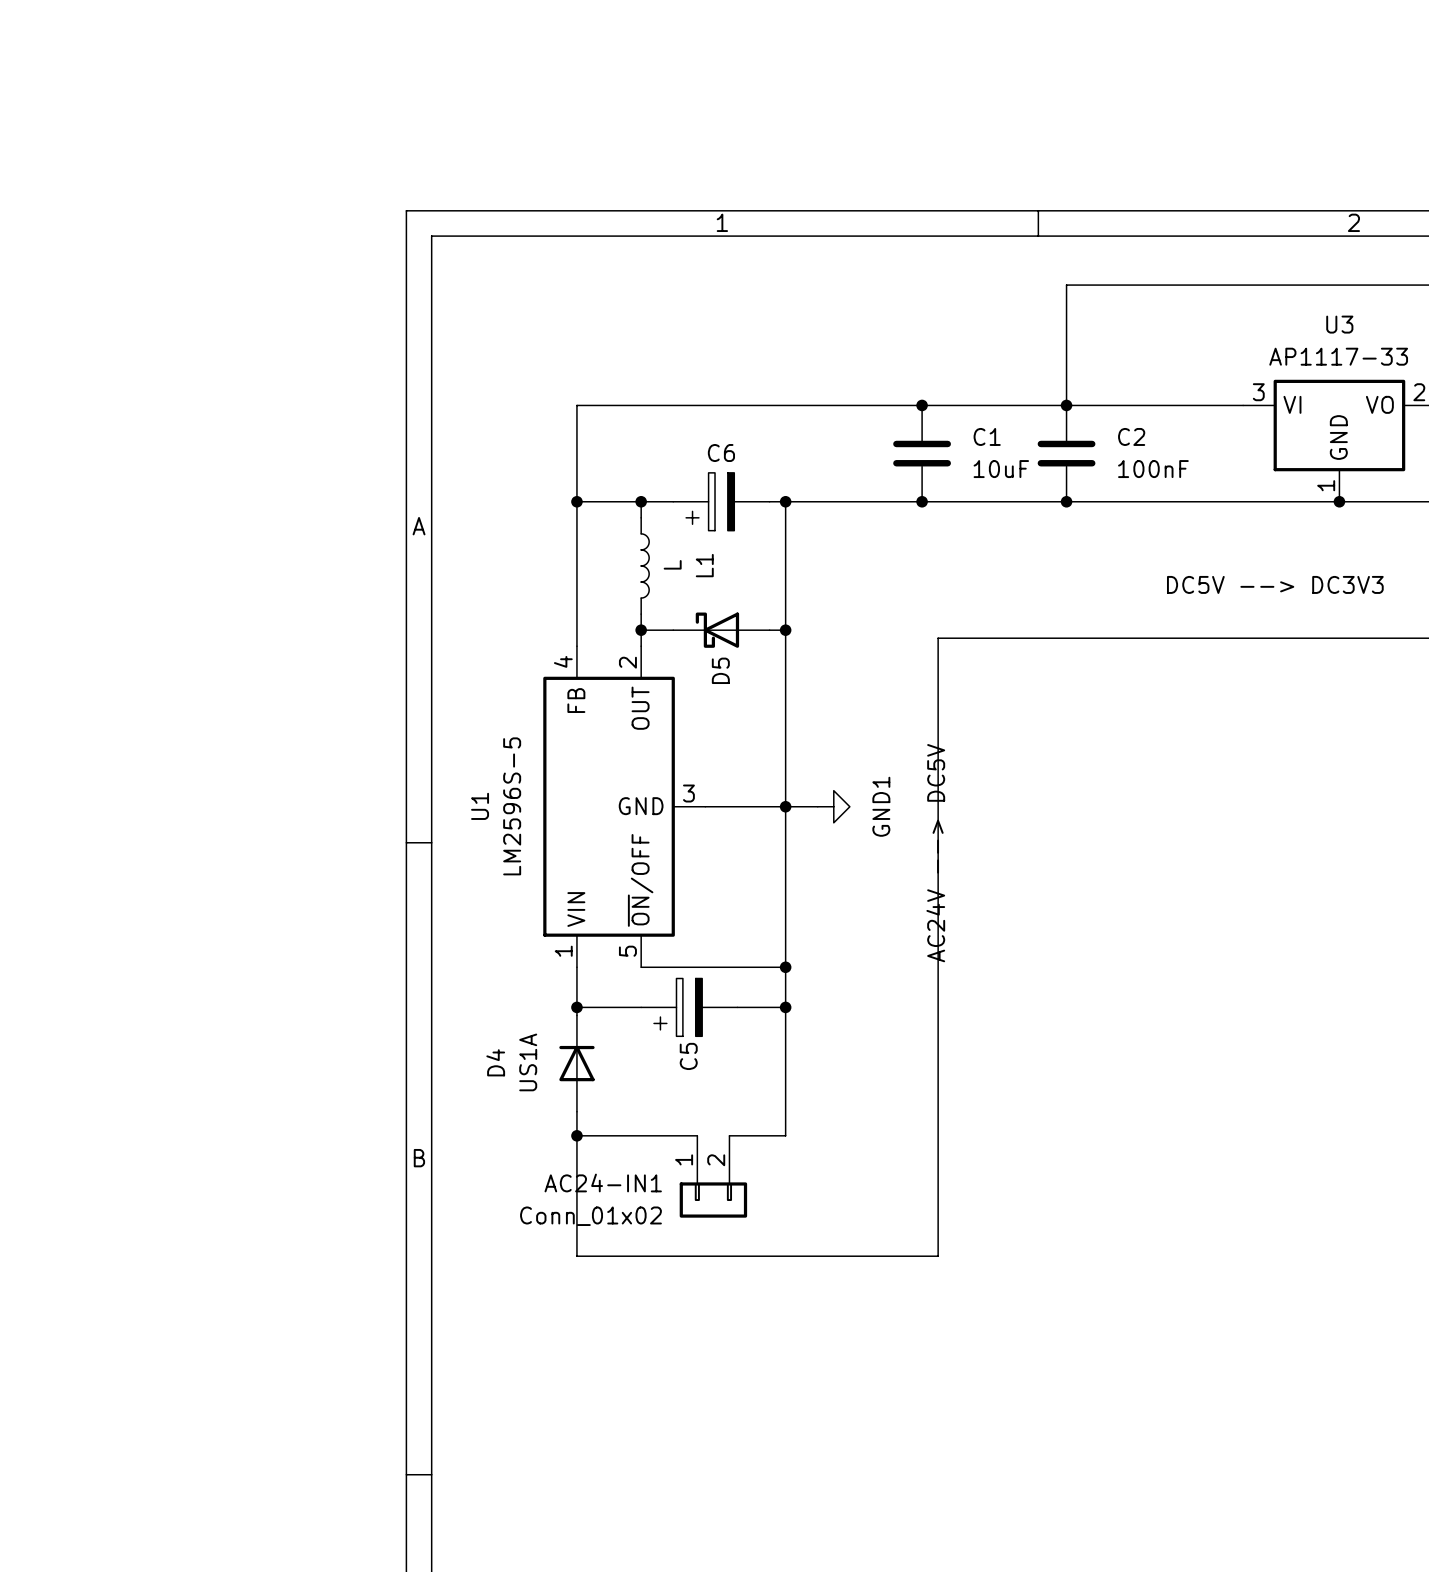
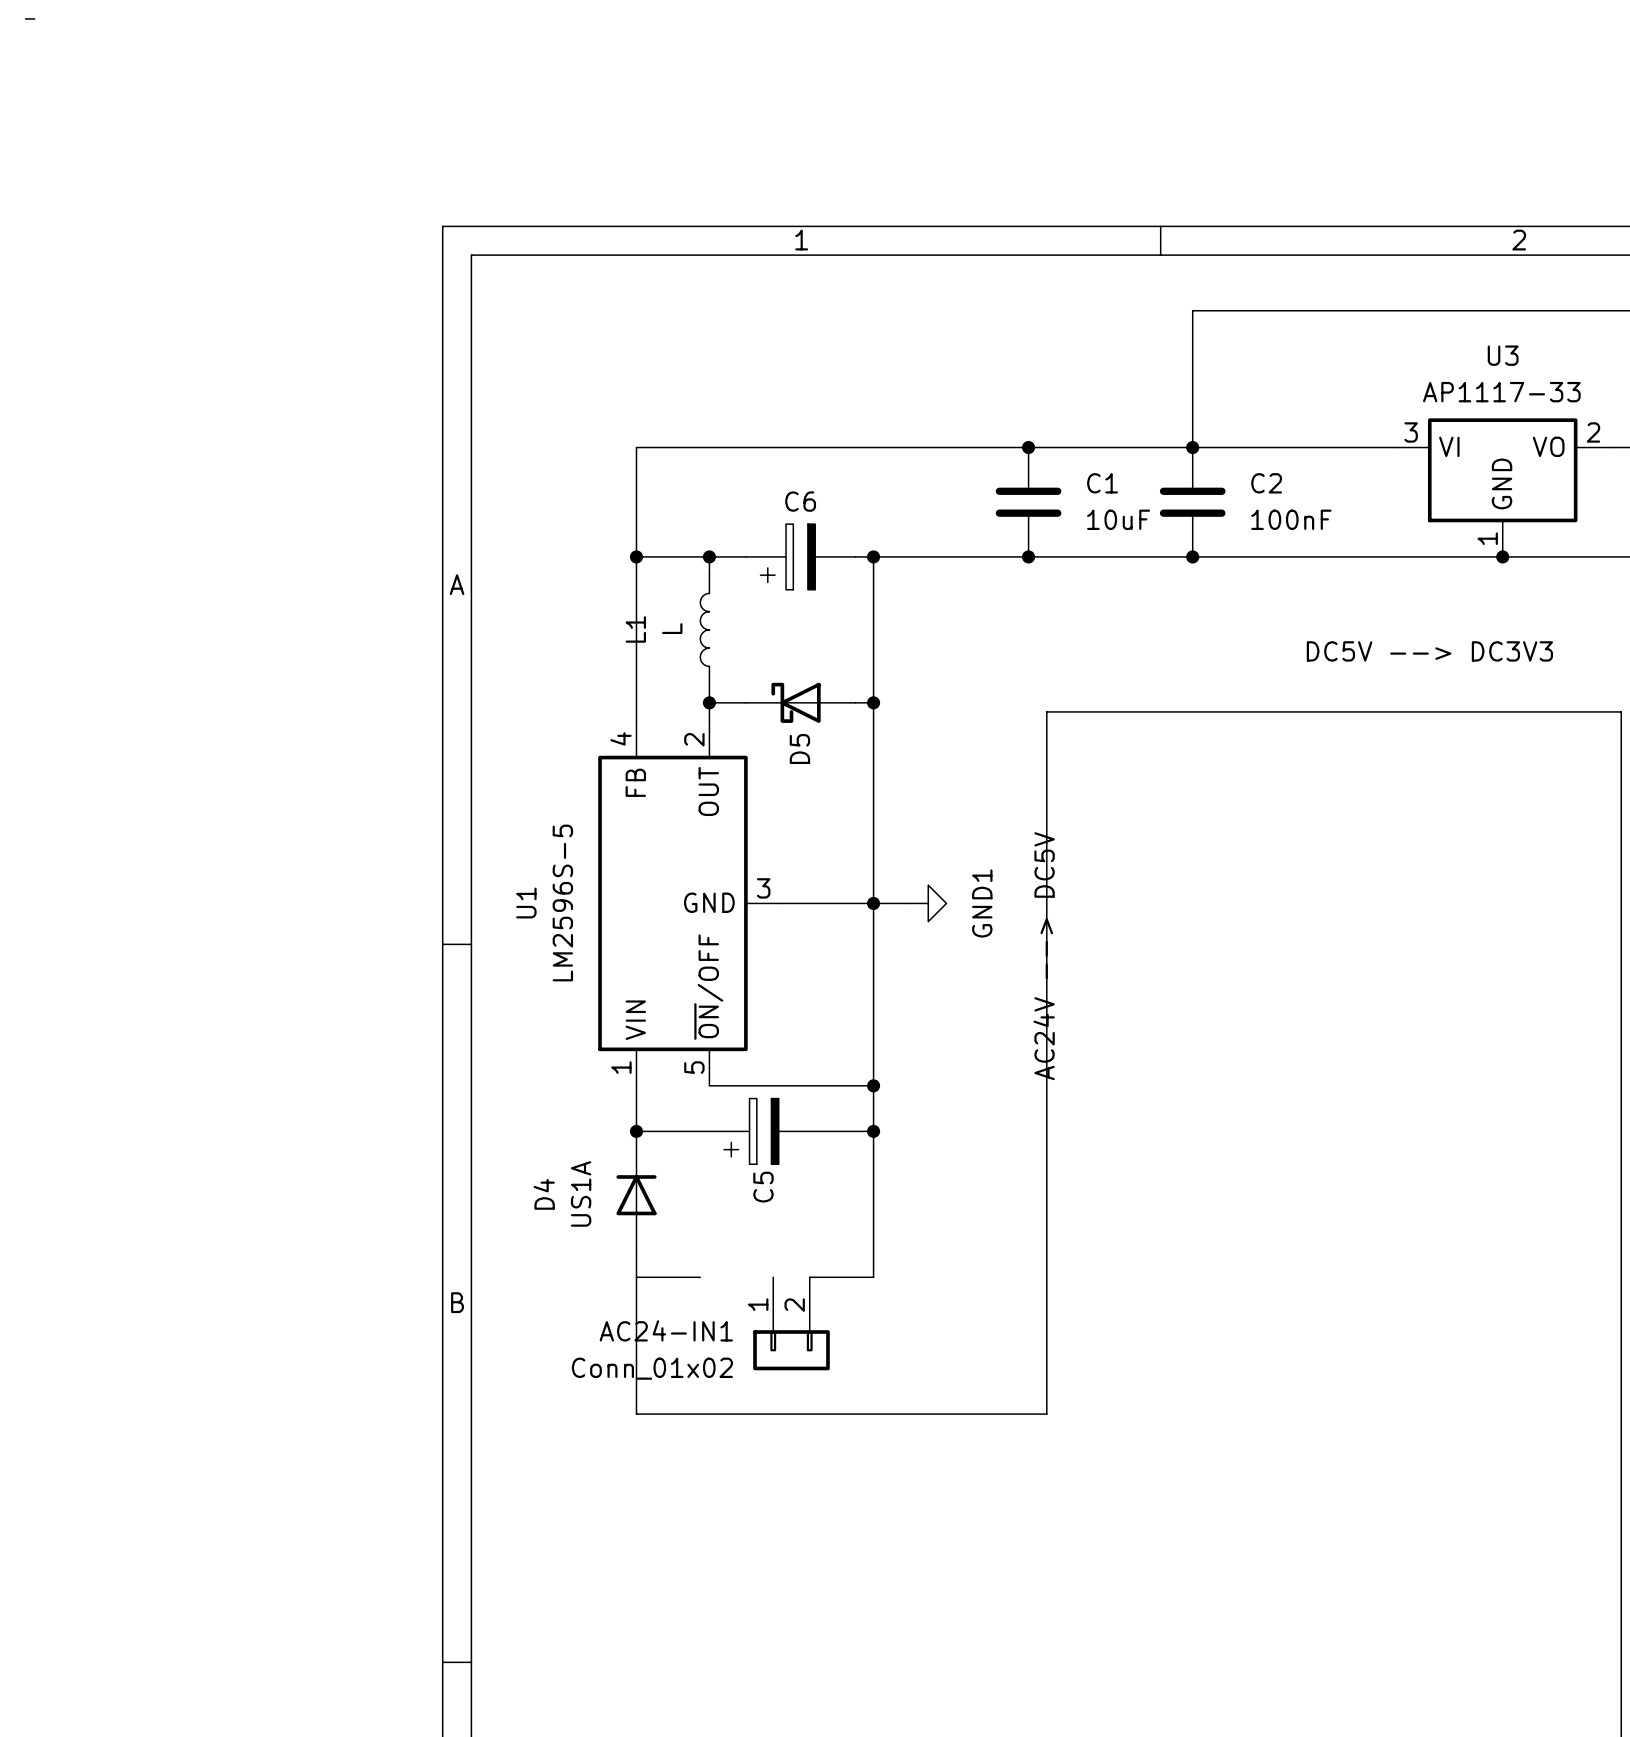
wire: none -> (25, 18) (34, 18)
L1 rotation: 0° (645, 565) -> 180° (704, 629)
junction: (576, 1135) -> none
wire: (633, 1135) (697, 1135) -> none

